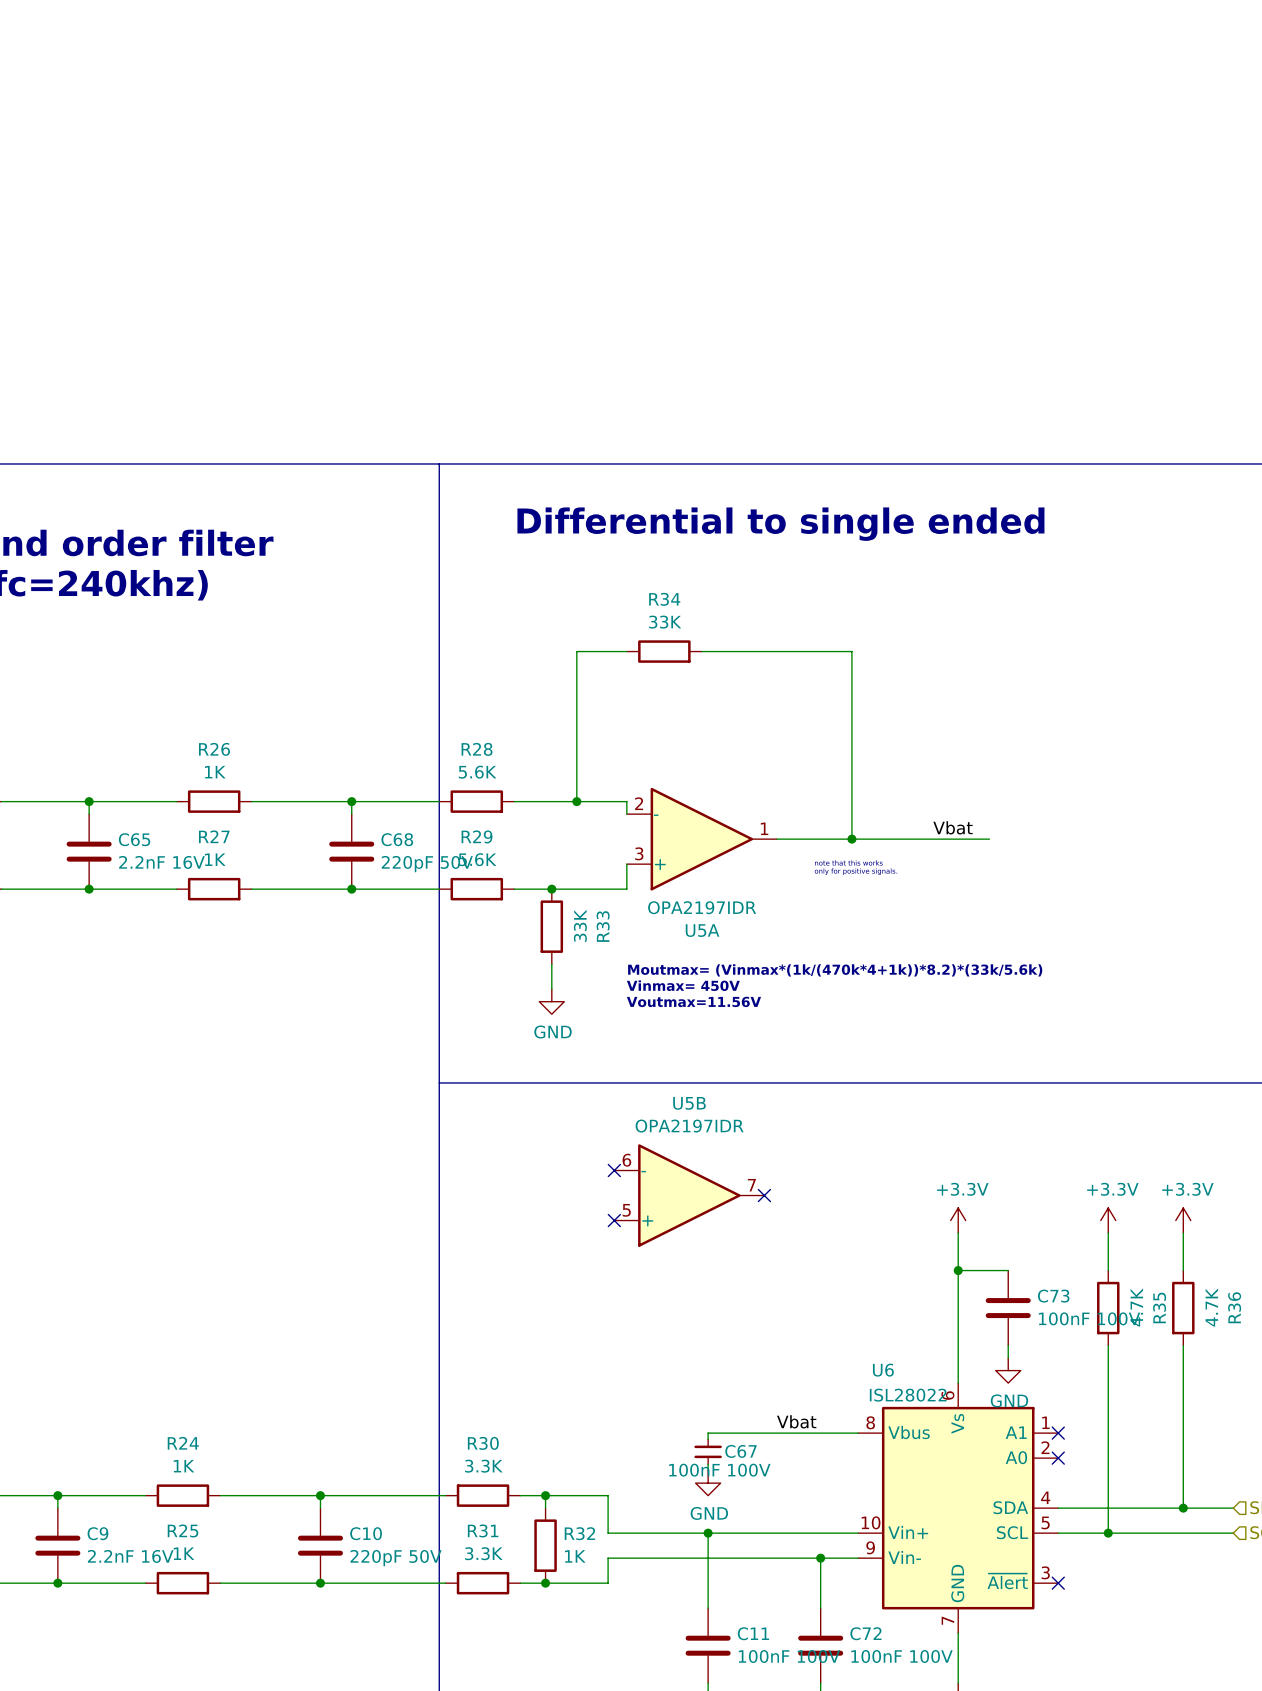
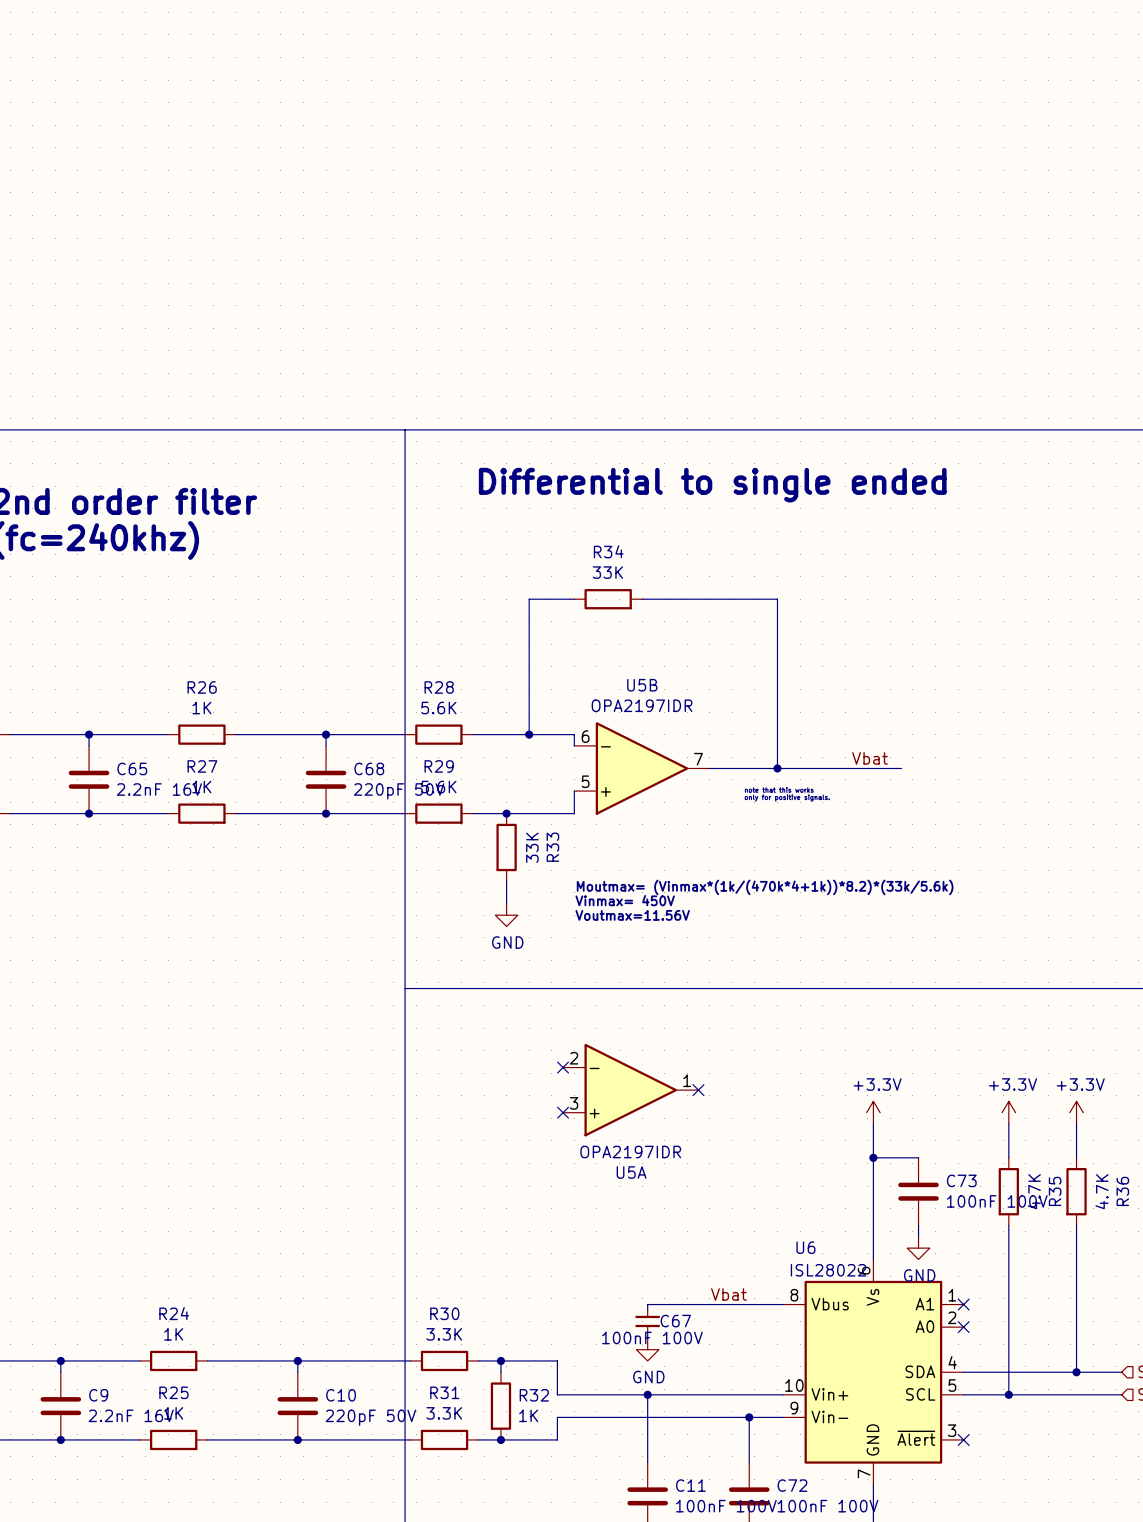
U5A position: (701, 839) -> (630, 1090)
U5B position: (689, 1195) -> (642, 768)

